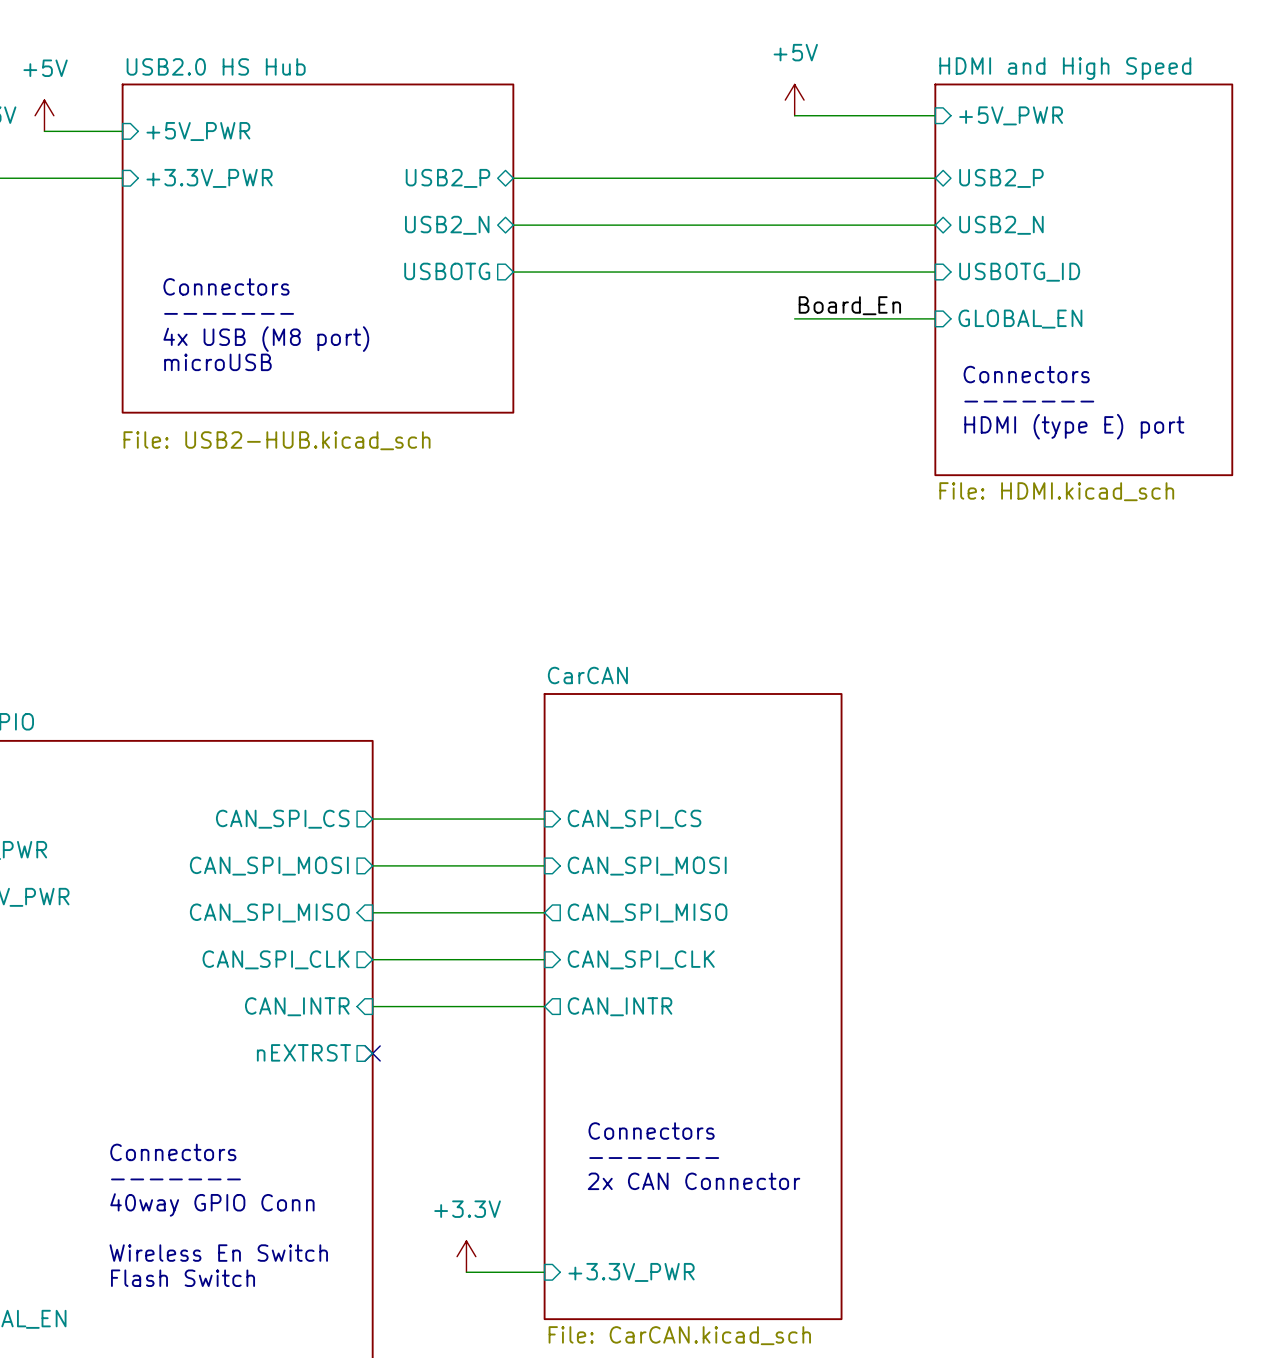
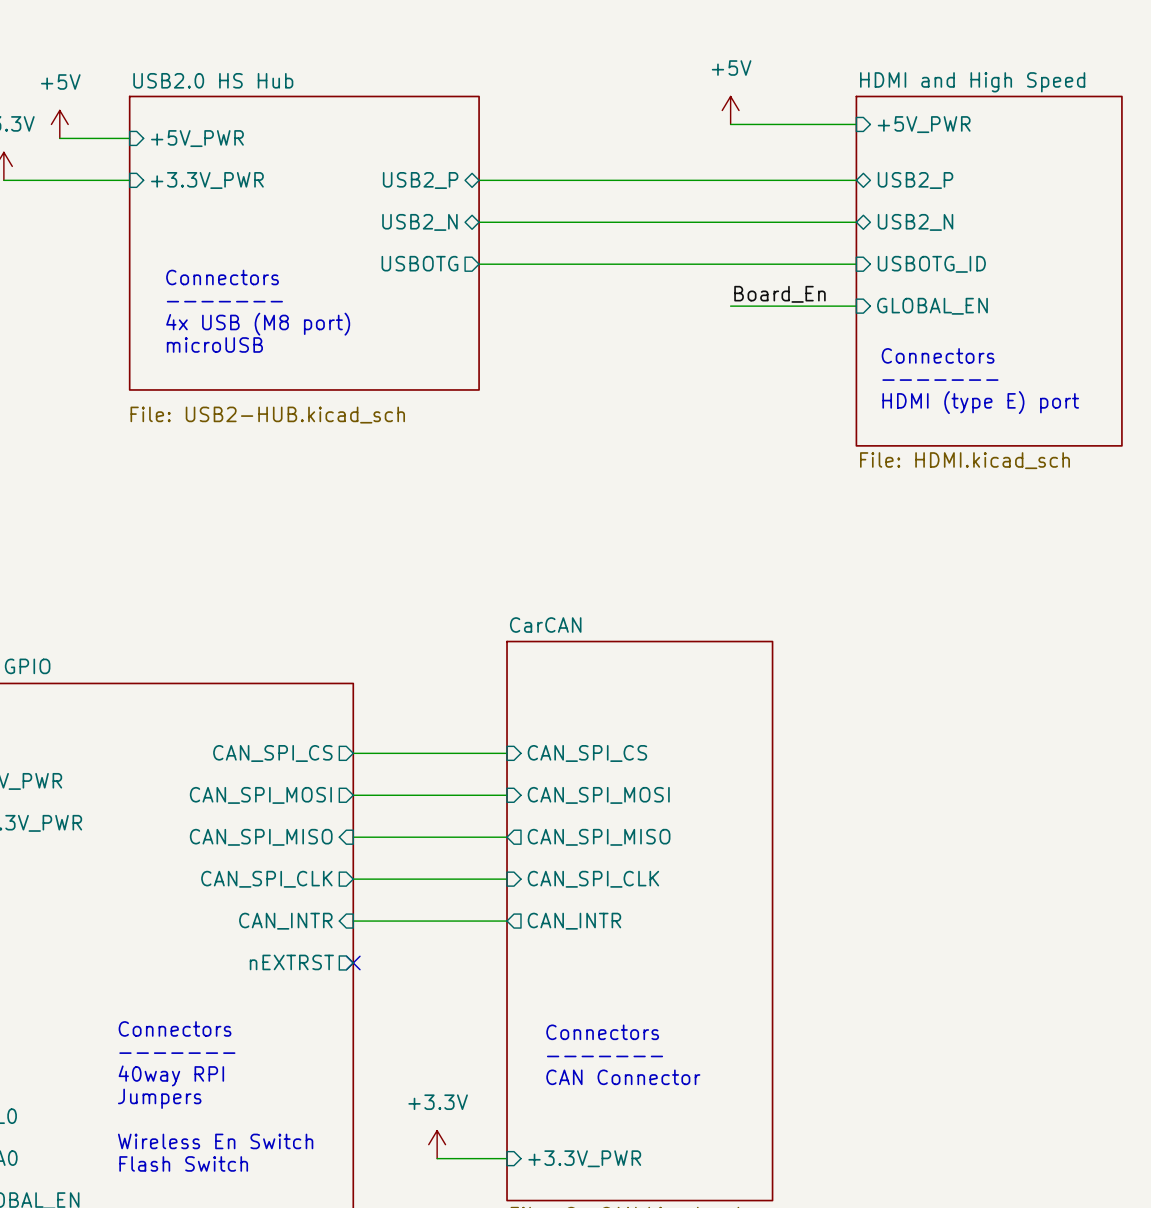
text: none -> Connectors (175, 1028)
text: Connectors (173, 1152) -> ------- (177, 1053)
text: ------- (175, 1179) -> 40way RPI (171, 1075)
text: 2x CAN Connector (694, 1181) -> CAN Connector (623, 1077)
text: 40way GPIO Conn (212, 1204) -> Jumpers (159, 1098)

